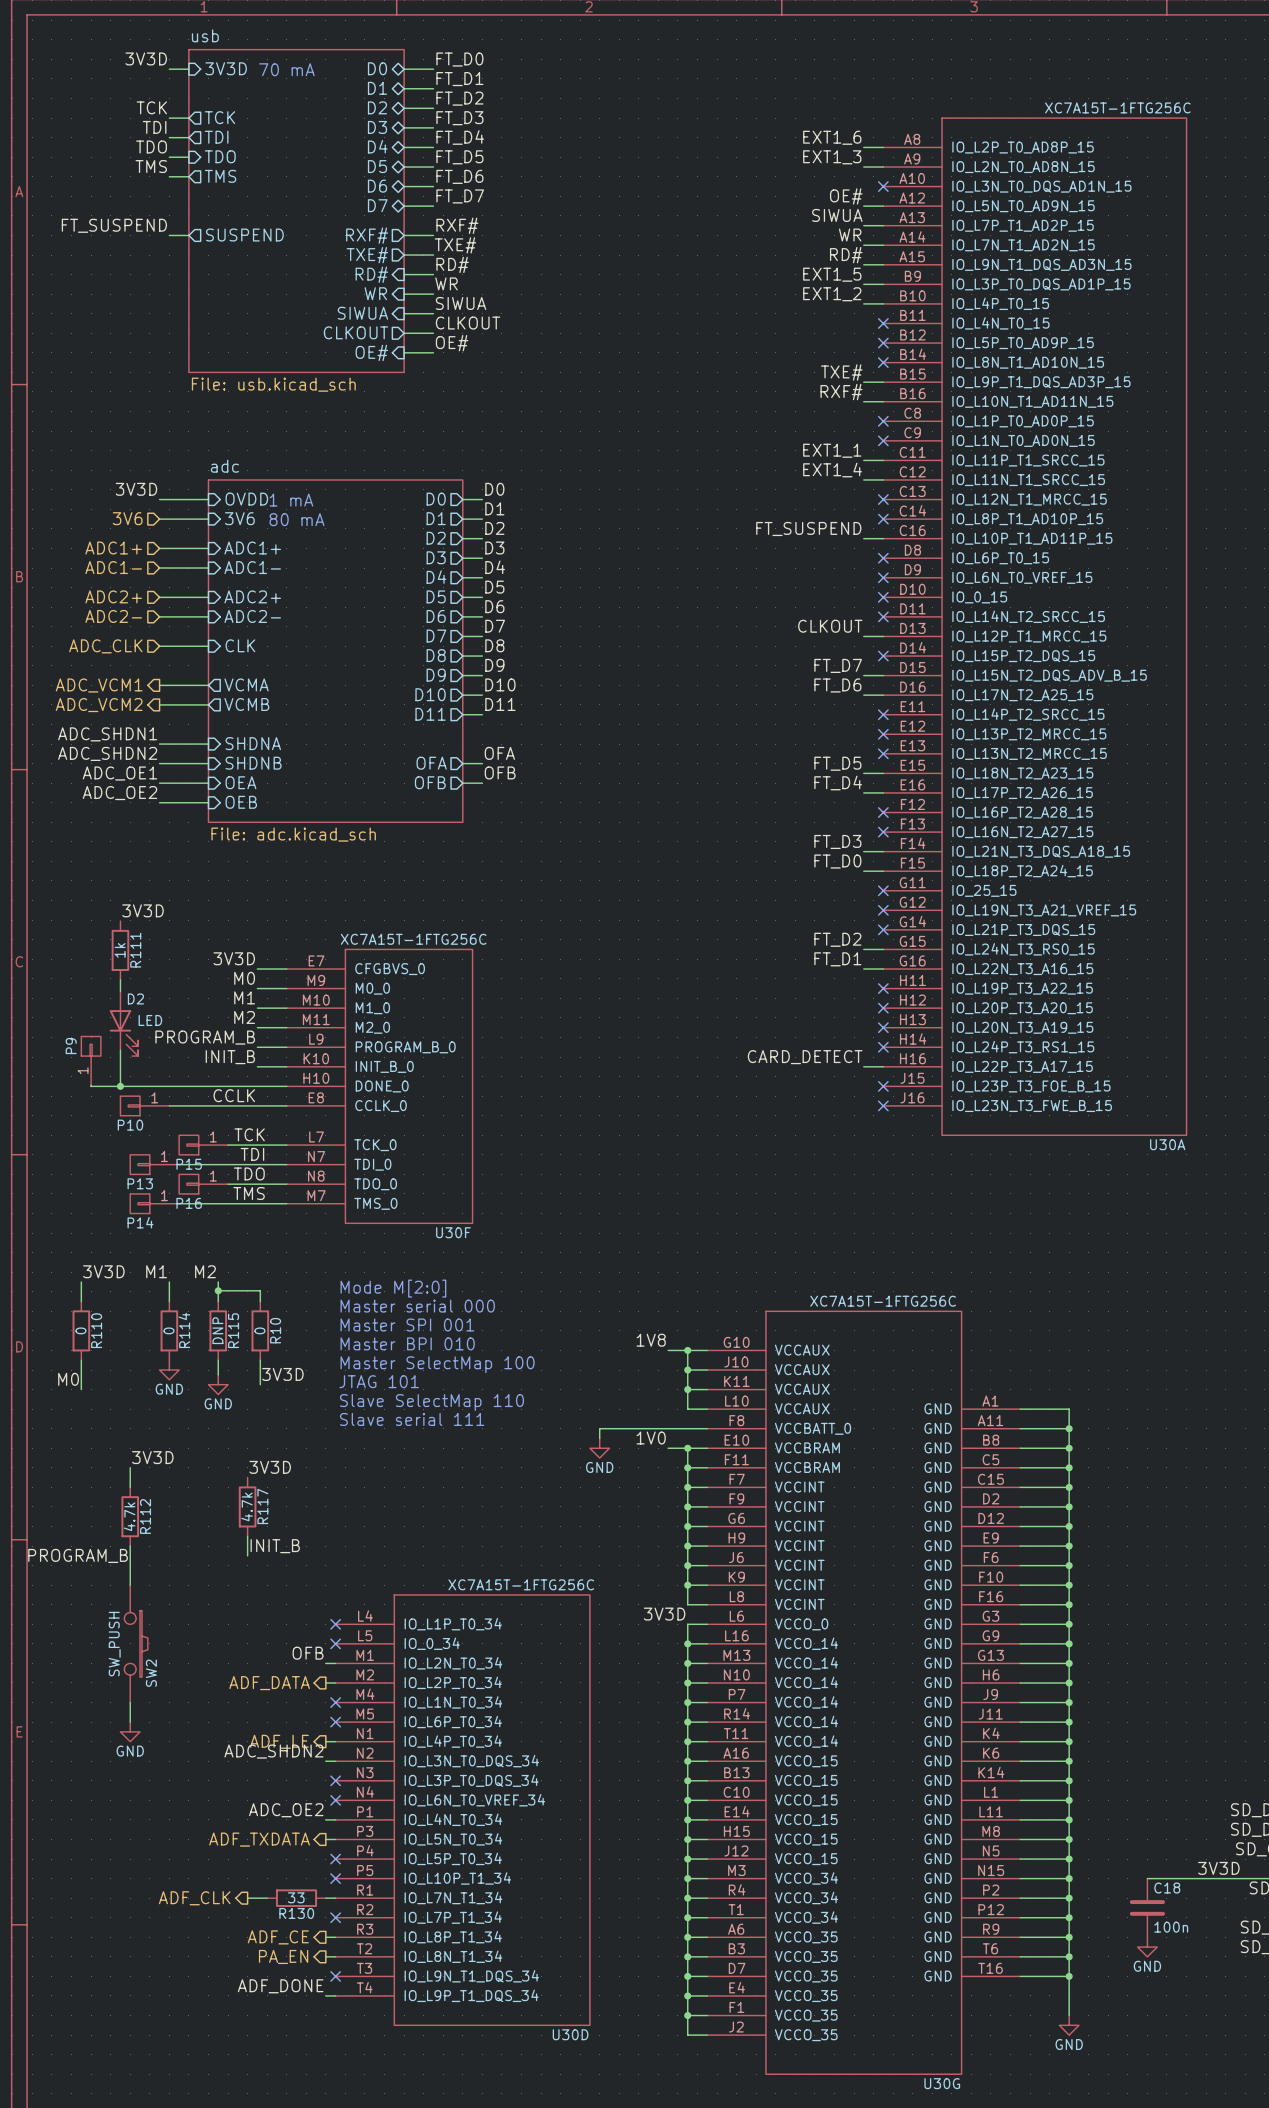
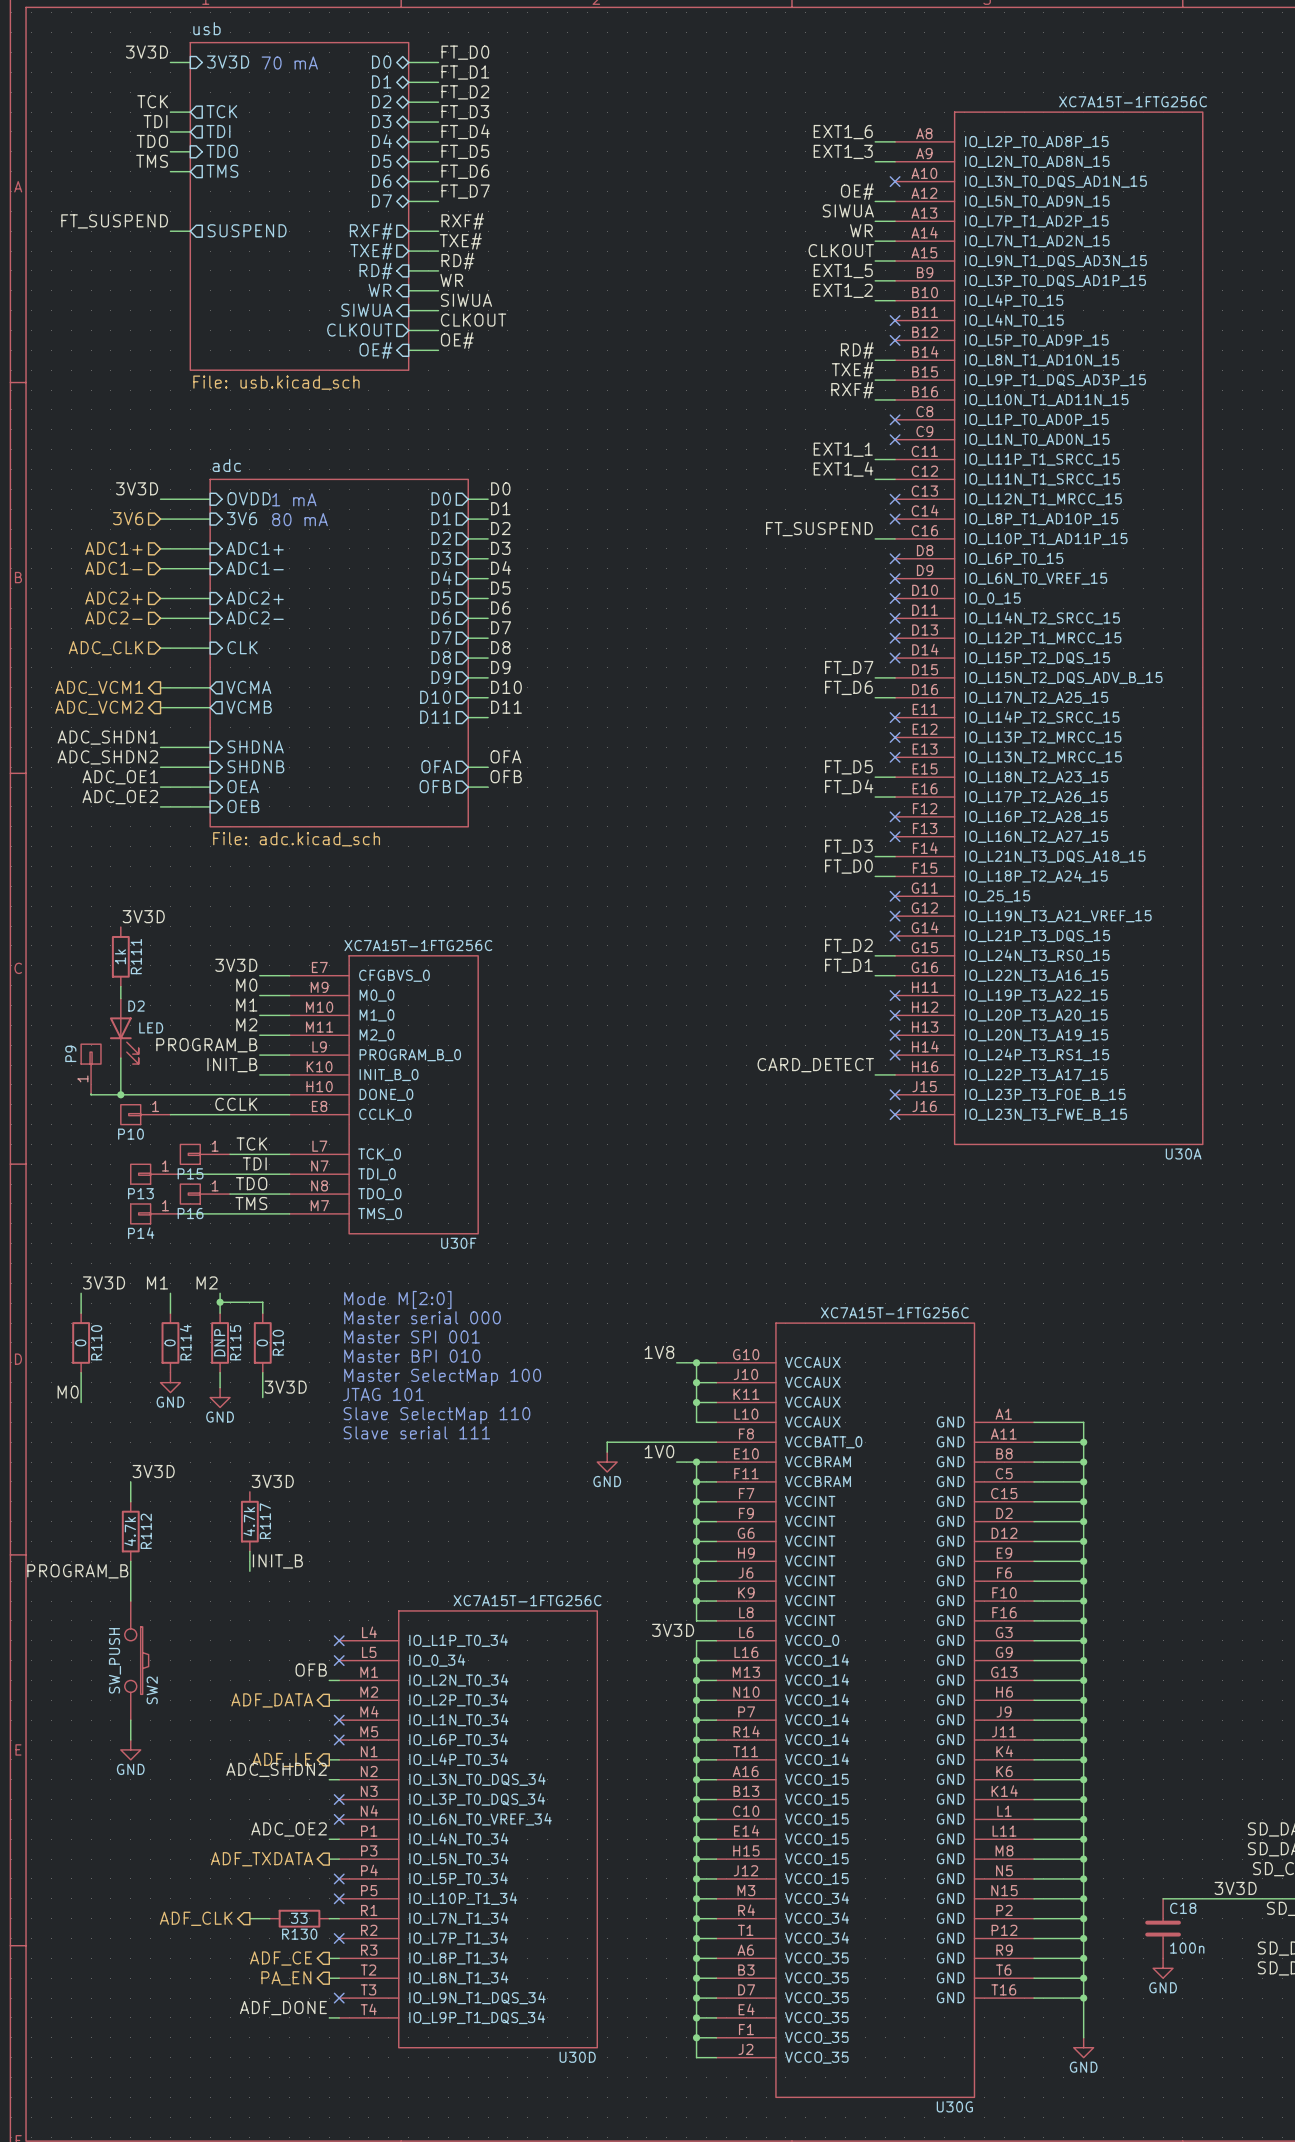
label: RD# (846, 255) -> CLKOUT (841, 250)
label: none -> RD# (857, 350)
wire: none -> (875, 360) (895, 360)
no-connect mark: (883, 362) -> none
label: CLKOUT (830, 626) -> none
wire: (863, 636) (883, 636) -> none
no-connect mark: none -> (895, 638)

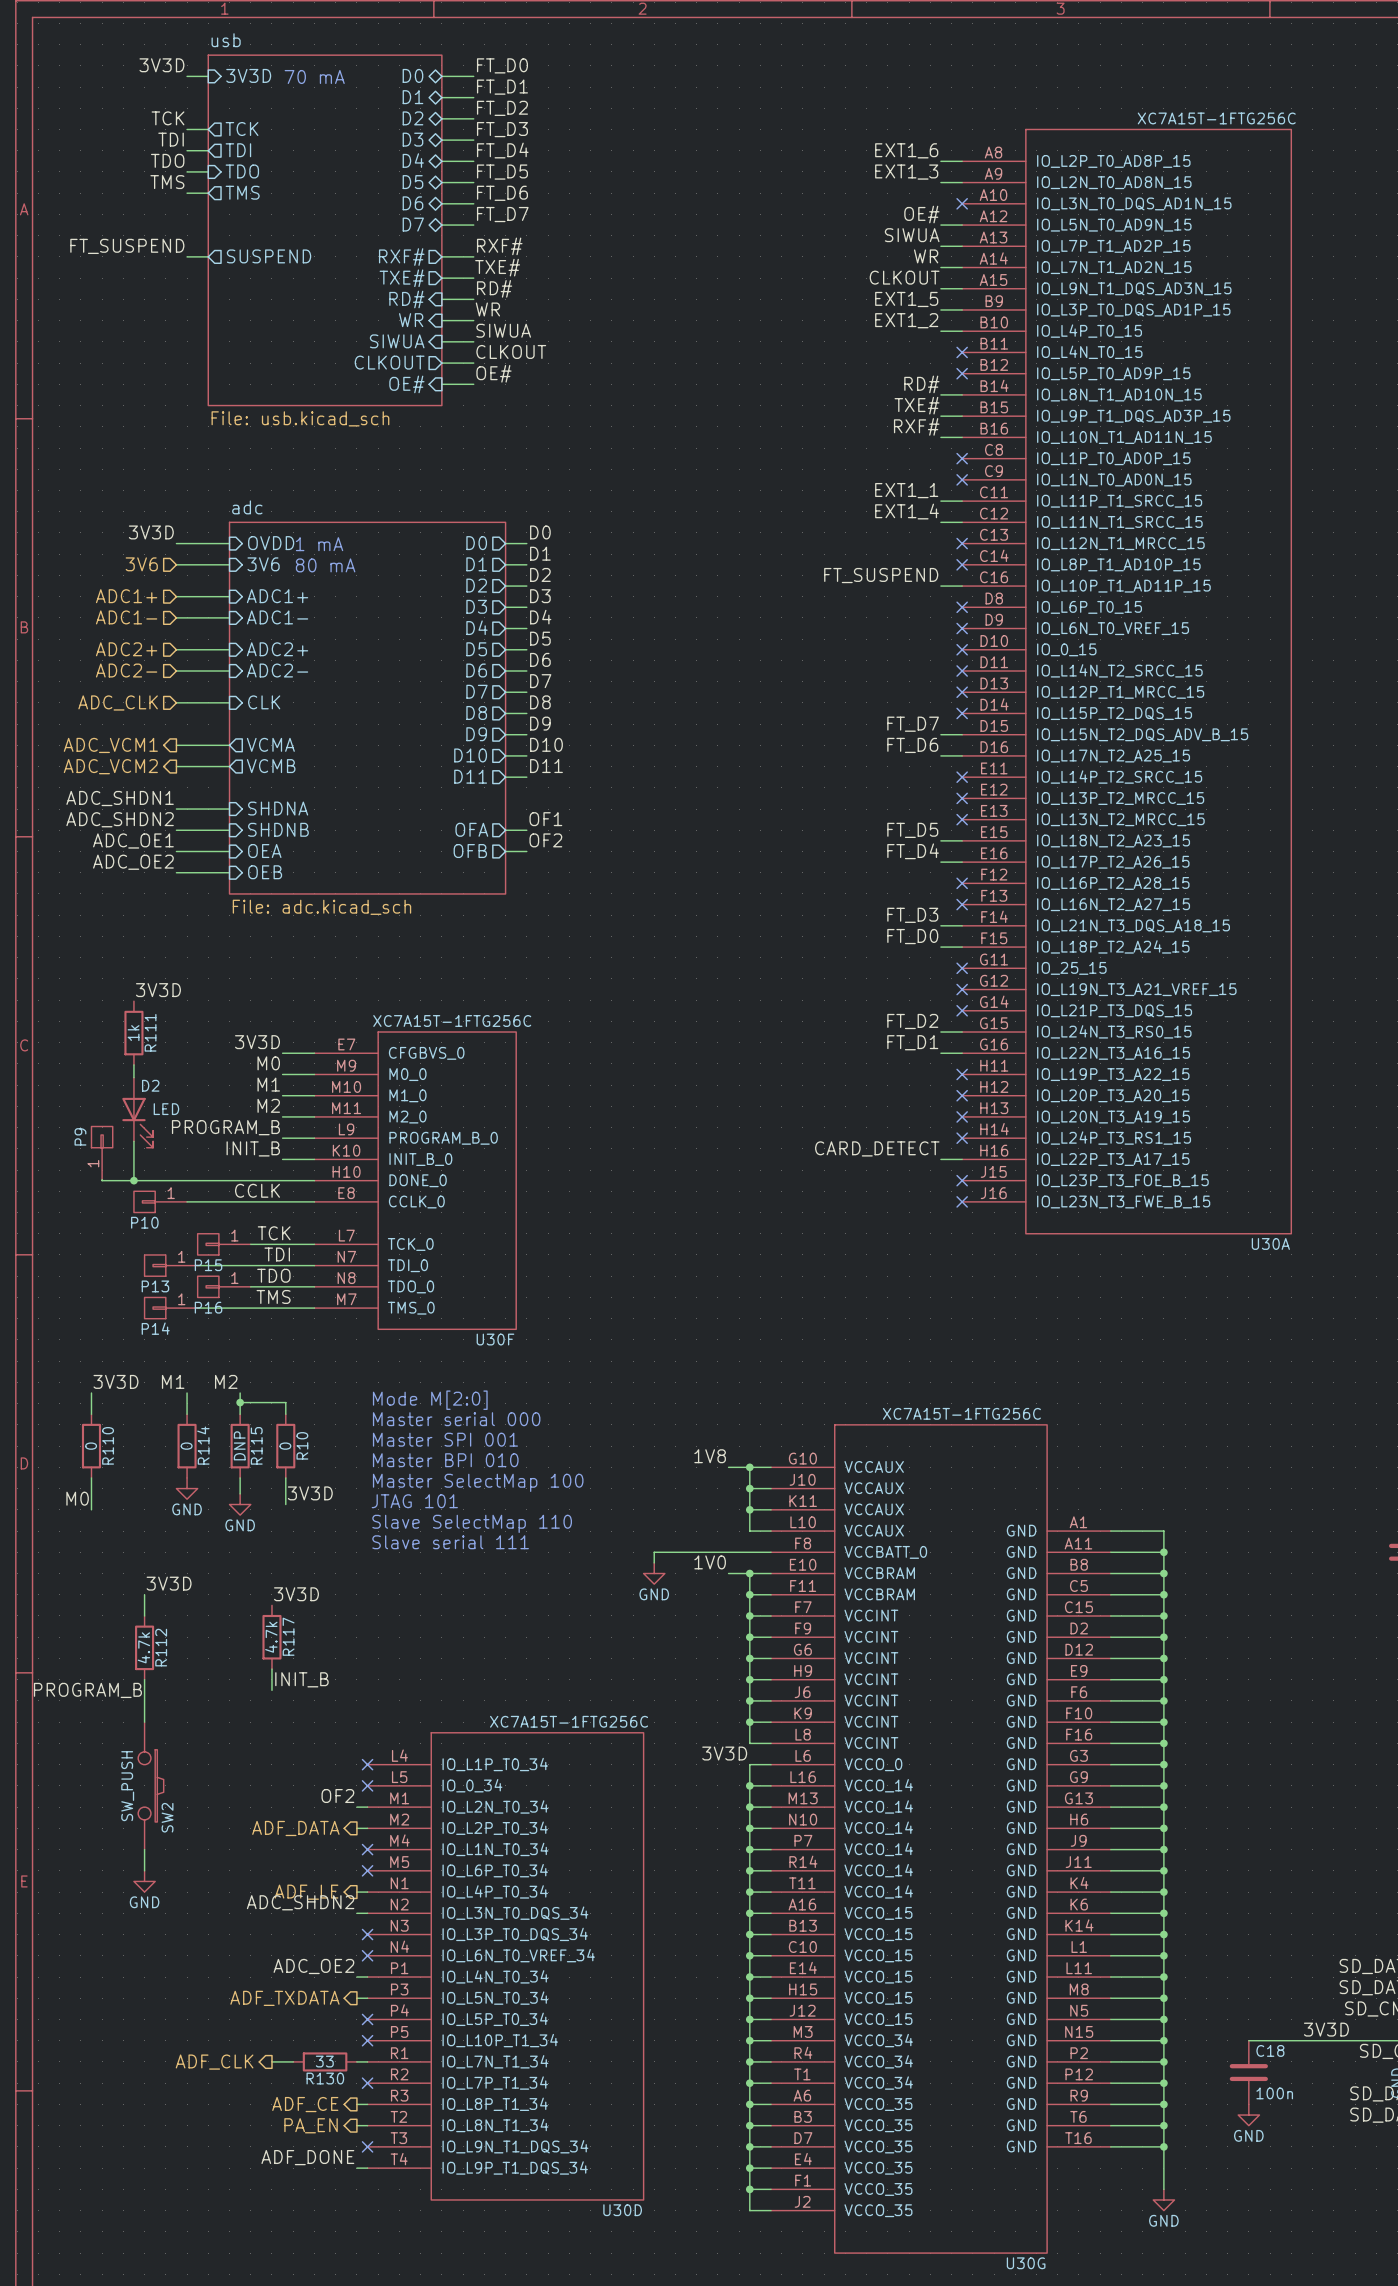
label: OFA (505, 756) -> OF1 (545, 819)
label: OFB (506, 776) -> OF2 (545, 840)
label: OFB (311, 1670) -> OF2 (337, 1796)

